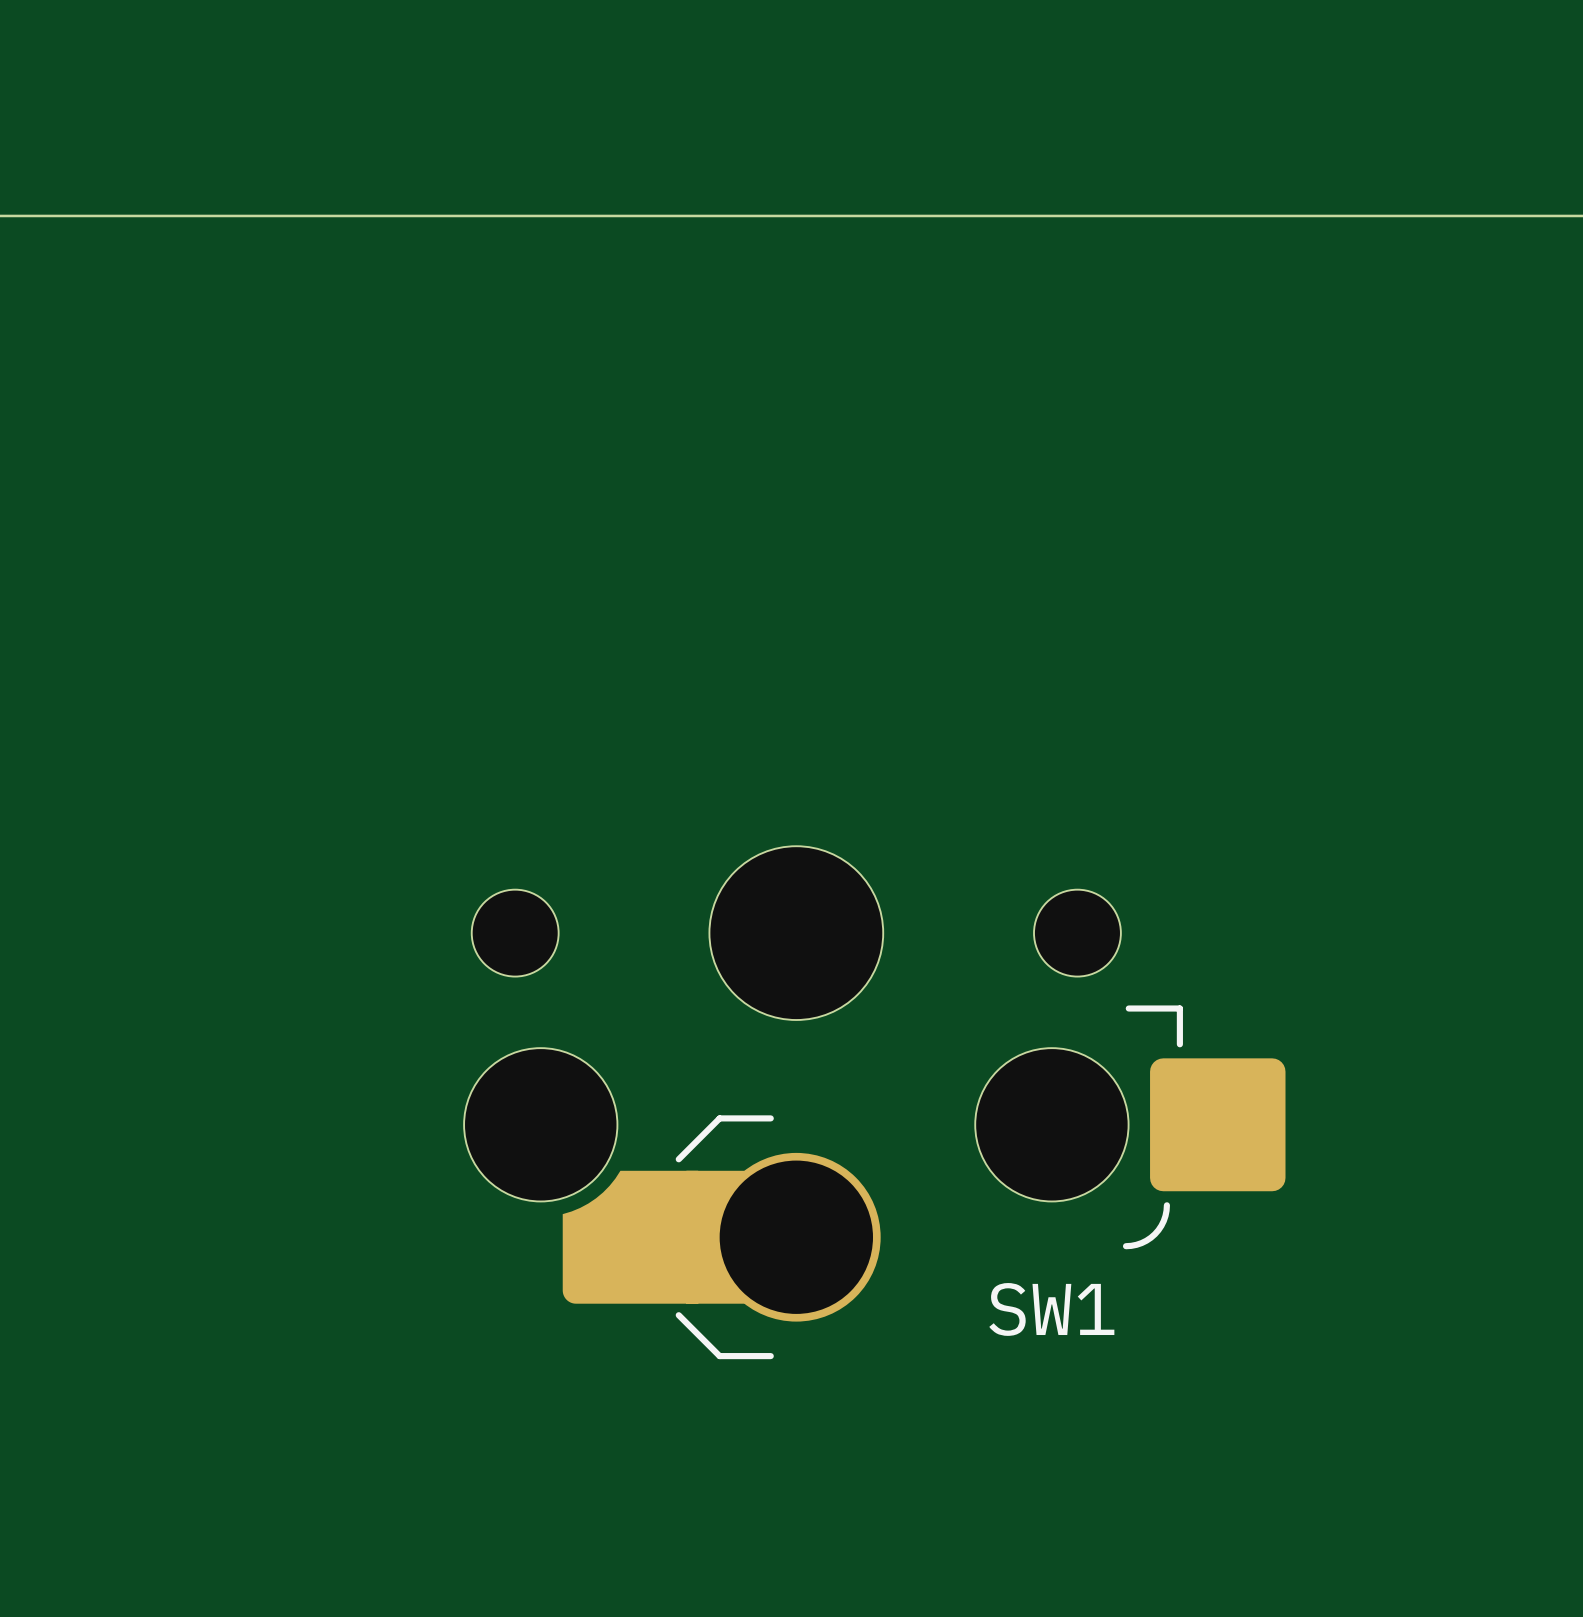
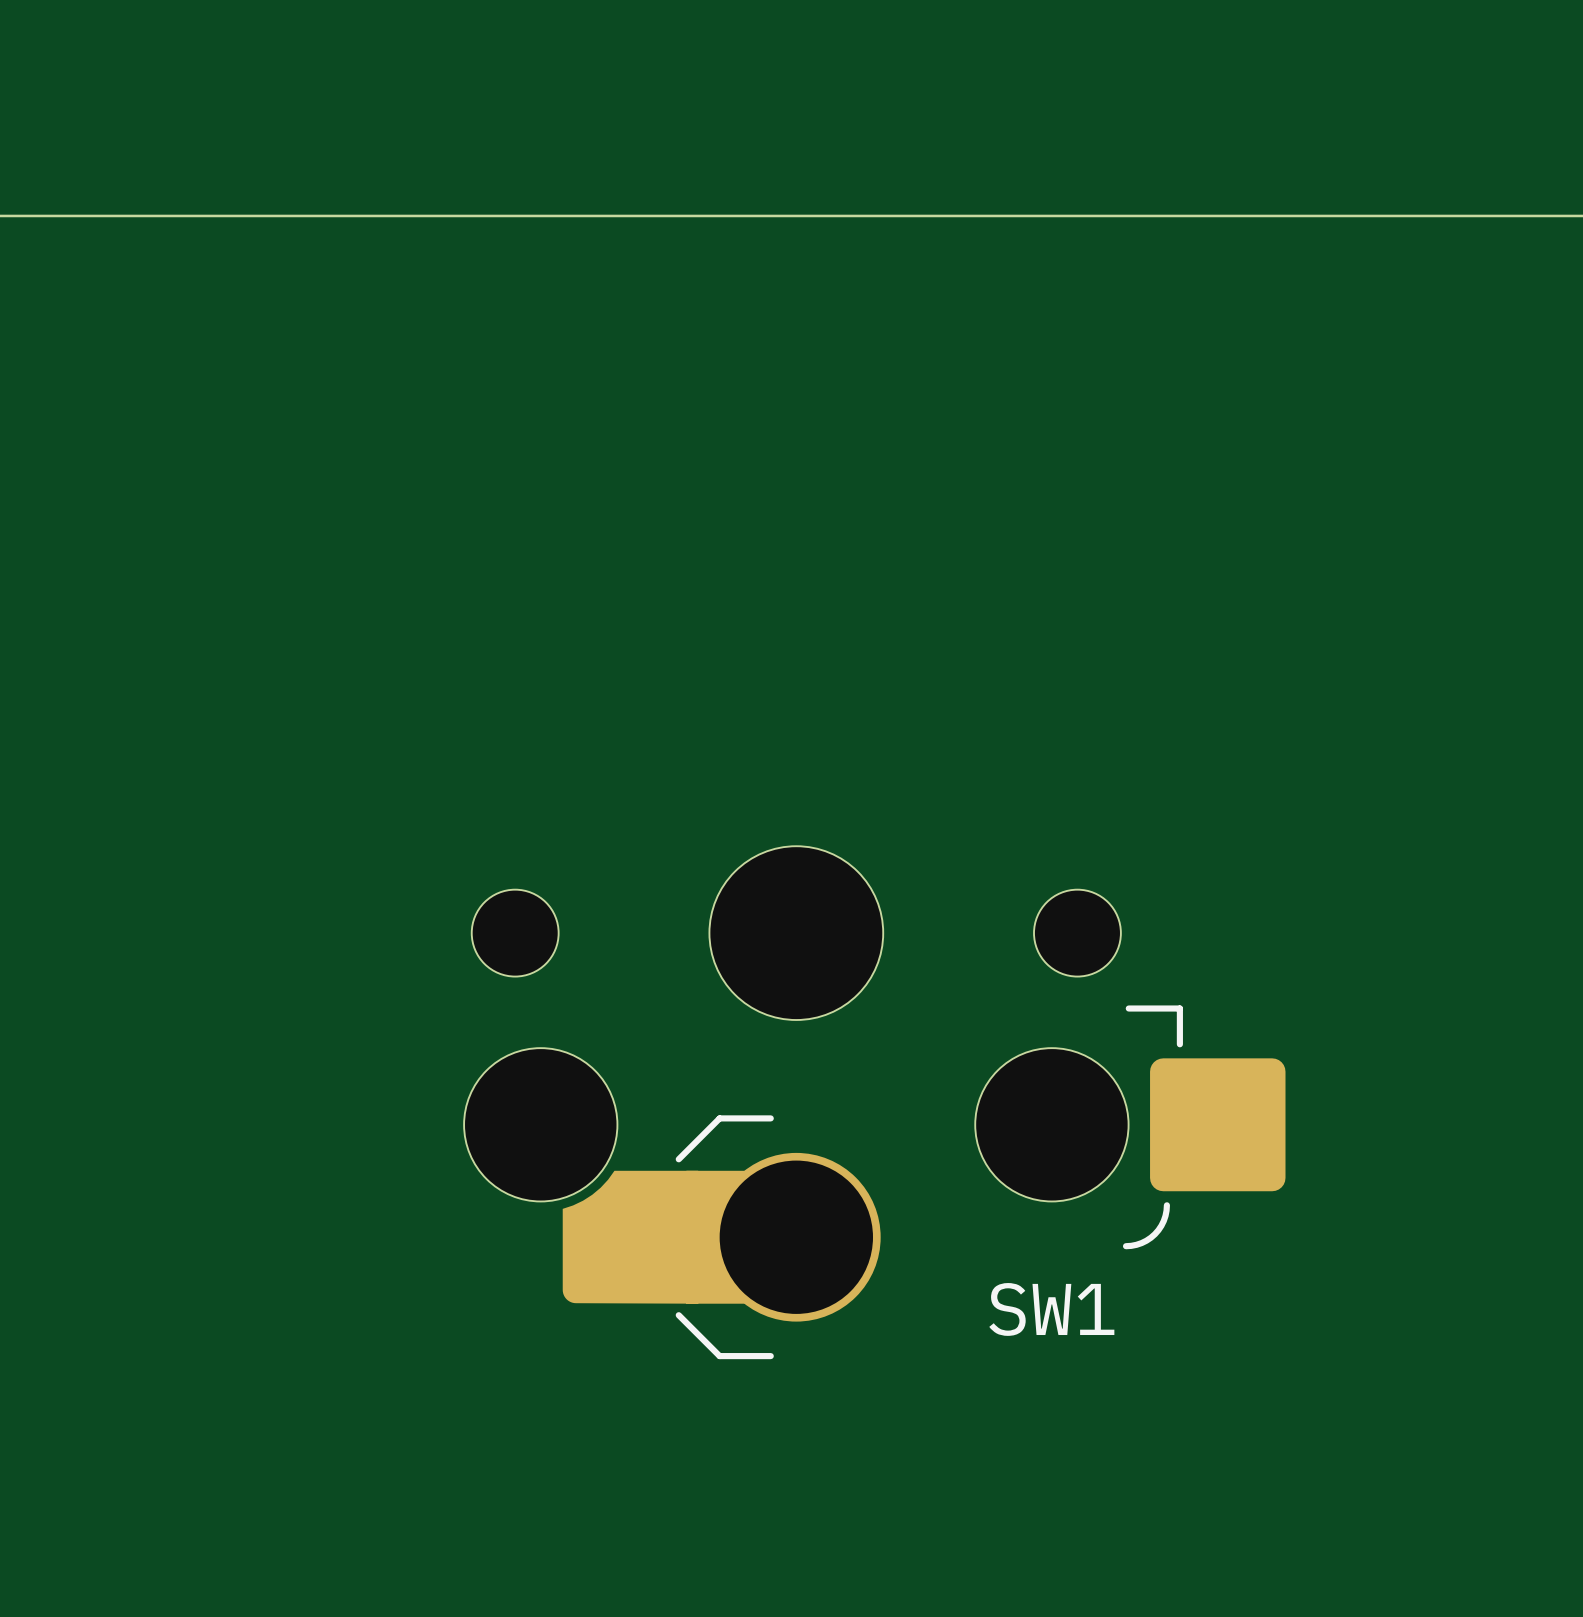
SW1 footprint: [464, 846, 1286, 1360] -> [464, 846, 1286, 1360]

